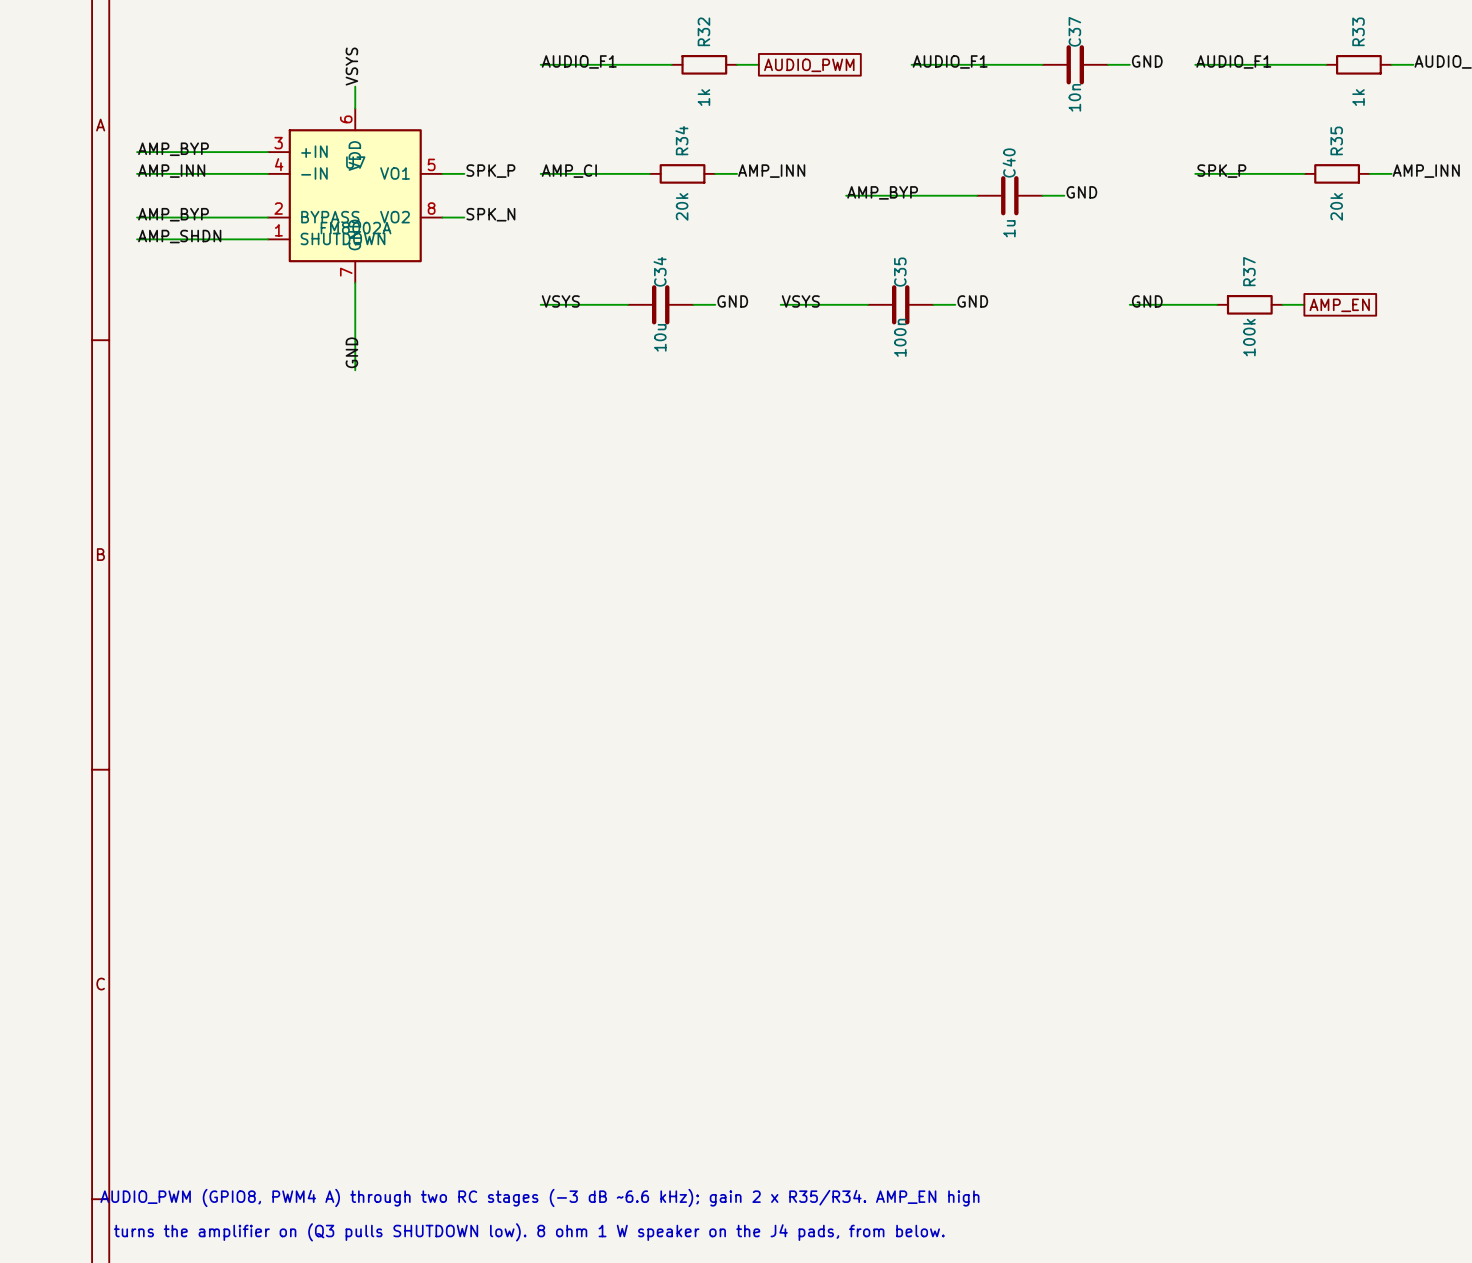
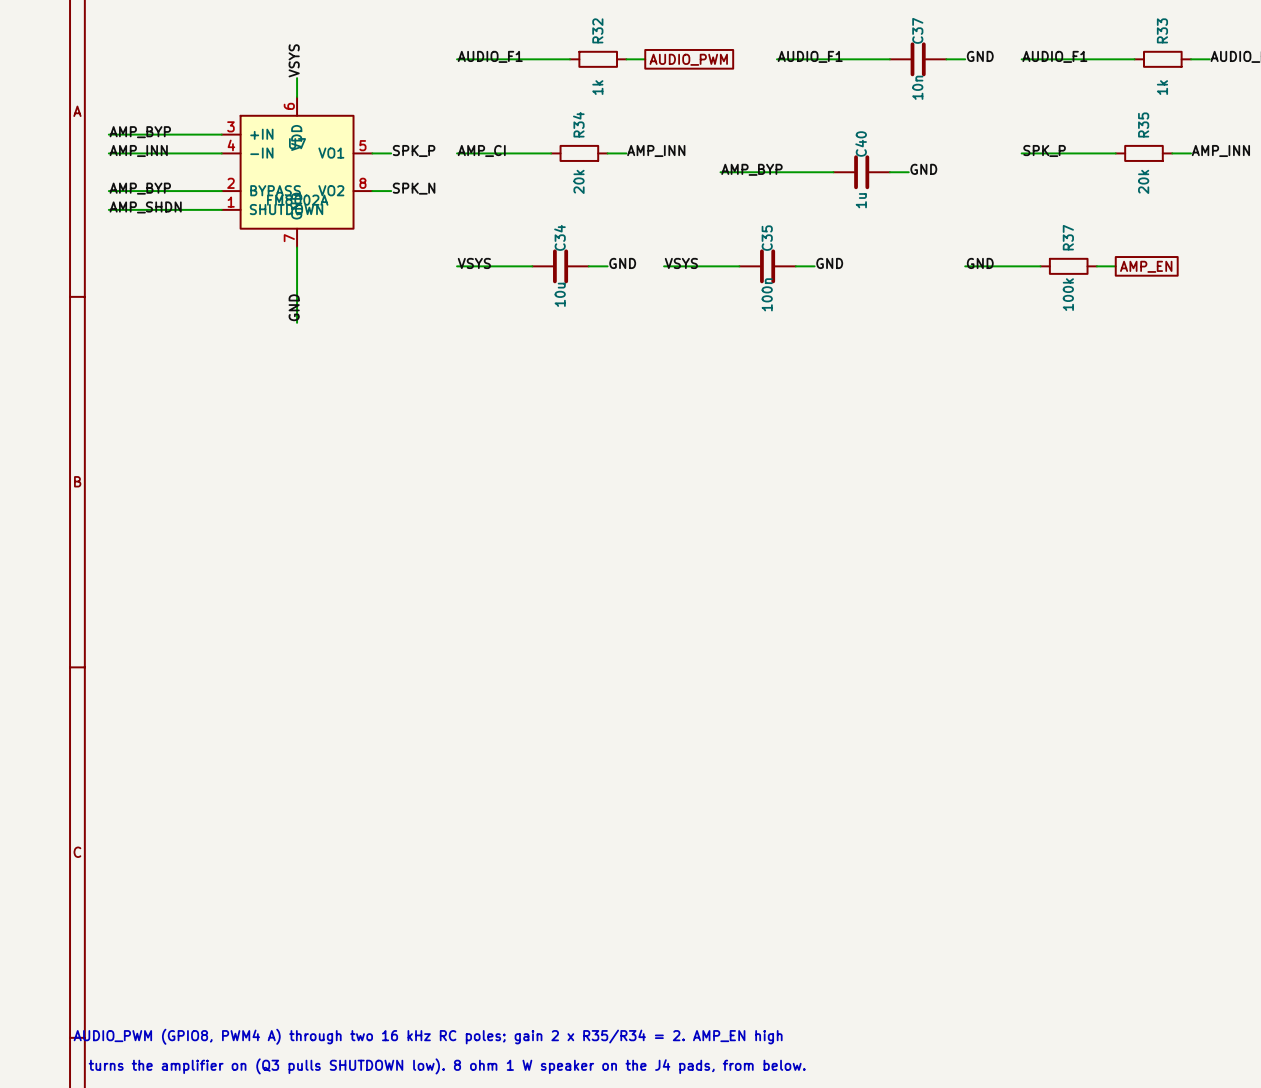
text: AUDIO_PWM (GPIO8, PWM4 A) through two RC stages (-3 dB ~6.6 kHz); gain 2 x R35/R34. AMP_EN high (539, 1197) -> AUDIO_PWM (GPIO8, PWM4 A) through two 16 kHz RC poles; gain 2 x R35/R34 = 2. AMP_EN high (428, 1036)

